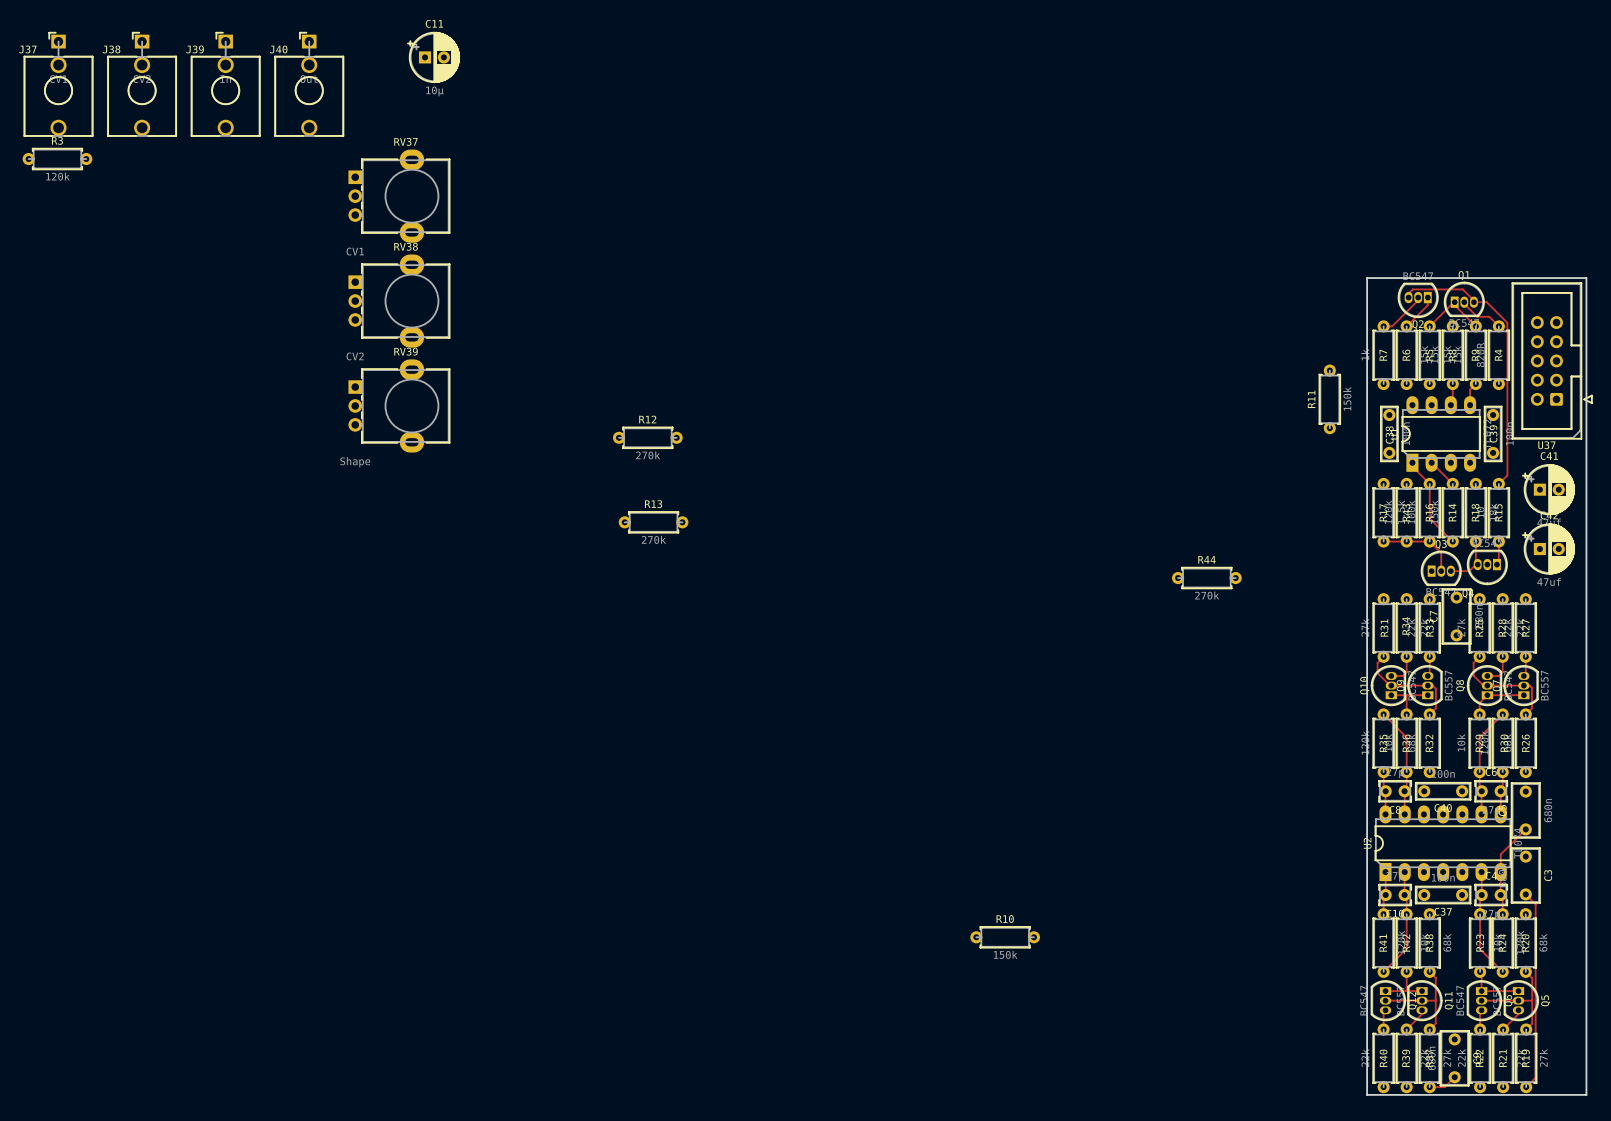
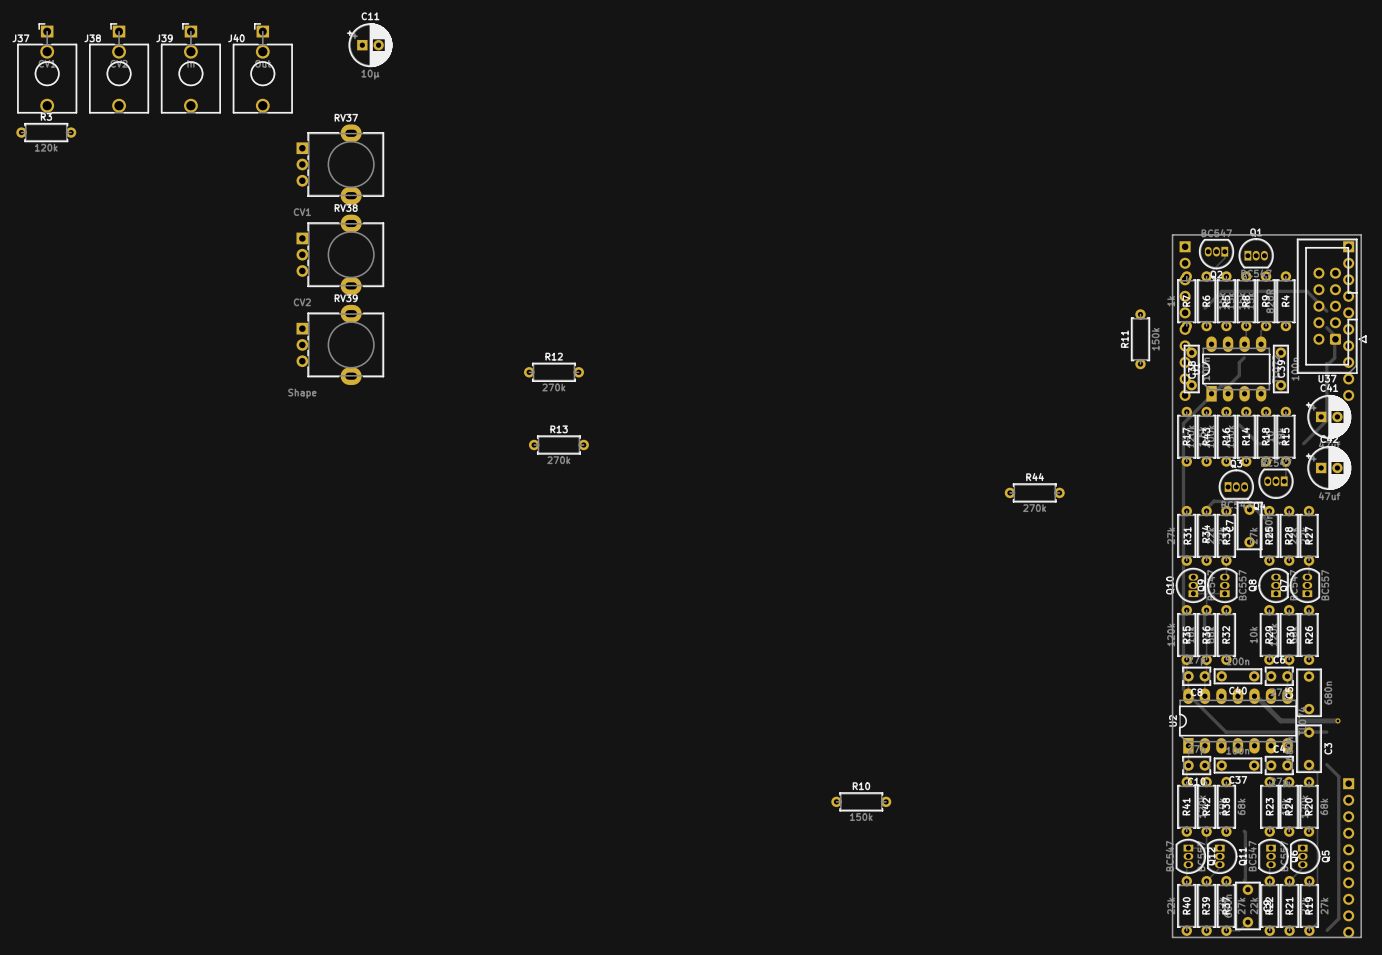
track: (1408, 297) (1408, 293) (1412, 289) (1462, 289) (1473, 302) (1486, 302) (1507, 322) (1507, 475) (1498, 483) -> none
track: (1418, 297) (1418, 300) (1392, 326) (1383, 326) -> none
track: (1464, 302) (1477, 316) (1489, 316) (1498, 326) -> none
track: (1429, 326) (1453, 302) (1475, 326) -> none
track: none -> (1204, 308) (1221, 291) (1306, 291) (1326, 311)
part: none -> (1185, 321)
part: none -> (1348, 321)
track: none -> (1326, 327) (1334, 335) (1334, 357) (1326, 363) (1326, 420) (1303, 443)
track: none -> (1244, 357) (1239, 362) (1239, 375) (1228, 386) (1220, 386) (1183, 423) (1183, 689) (1226, 732) (1326, 732)
track: (1412, 462) (1412, 466) (1429, 483) (1429, 518) (1452, 541) -> none
track: (1431, 462) (1452, 483) -> none
track: none -> (1239, 424) (1258, 443) (1264, 443)
track: (1383, 541) (1429, 541) (1441, 553) (1441, 571) -> none
track: (1475, 541) (1475, 564) (1469, 571) (1450, 571) -> none
track: none -> (1204, 510) (1214, 501) (1247, 501) (1266, 519)
track: (1383, 656) (1377, 662) (1377, 673) (1390, 685) (1432, 685) (1435, 688) (1435, 708) (1429, 714) -> none
track: (1406, 656) (1406, 672) (1402, 676) (1391, 676) -> none
track: (1479, 656) (1473, 662) (1473, 675) (1483, 685) (1529, 685) (1531, 687) (1531, 708) (1525, 714) -> none
track: (1502, 656) (1502, 672) (1498, 676) (1487, 676) -> none
track: (1523, 695) (1487, 695) (1479, 702) (1479, 714) -> none
track: (1383, 714) (1404, 735) -> (1204, 609) (1204, 627)
track: (1502, 714) (1479, 737) (1481, 814) -> none
track: none -> (1255, 695) (1280, 720) (1337, 720)
track: (1525, 829) (1500, 854) (1502, 914) -> none
via: none -> (1337, 720)
track: (1404, 872) (1406, 948) (1383, 971) -> none
track: (1481, 872) (1479, 948) (1502, 971) -> none
track: none -> (1326, 764) (1338, 776) (1338, 918) (1327, 930)
track: (1429, 971) (1435, 977) (1435, 1023) (1429, 1029) -> none
track: none -> (1244, 831) (1244, 880)
track: (1480, 971) (1481, 991) (1518, 991) -> none
track: (1525, 971) (1532, 978) (1532, 1023) (1526, 1029) -> none
track: (1385, 1000) (1435, 1000) -> none
track: (1481, 1000) (1532, 1000) -> none
part: none -> (1348, 858)

